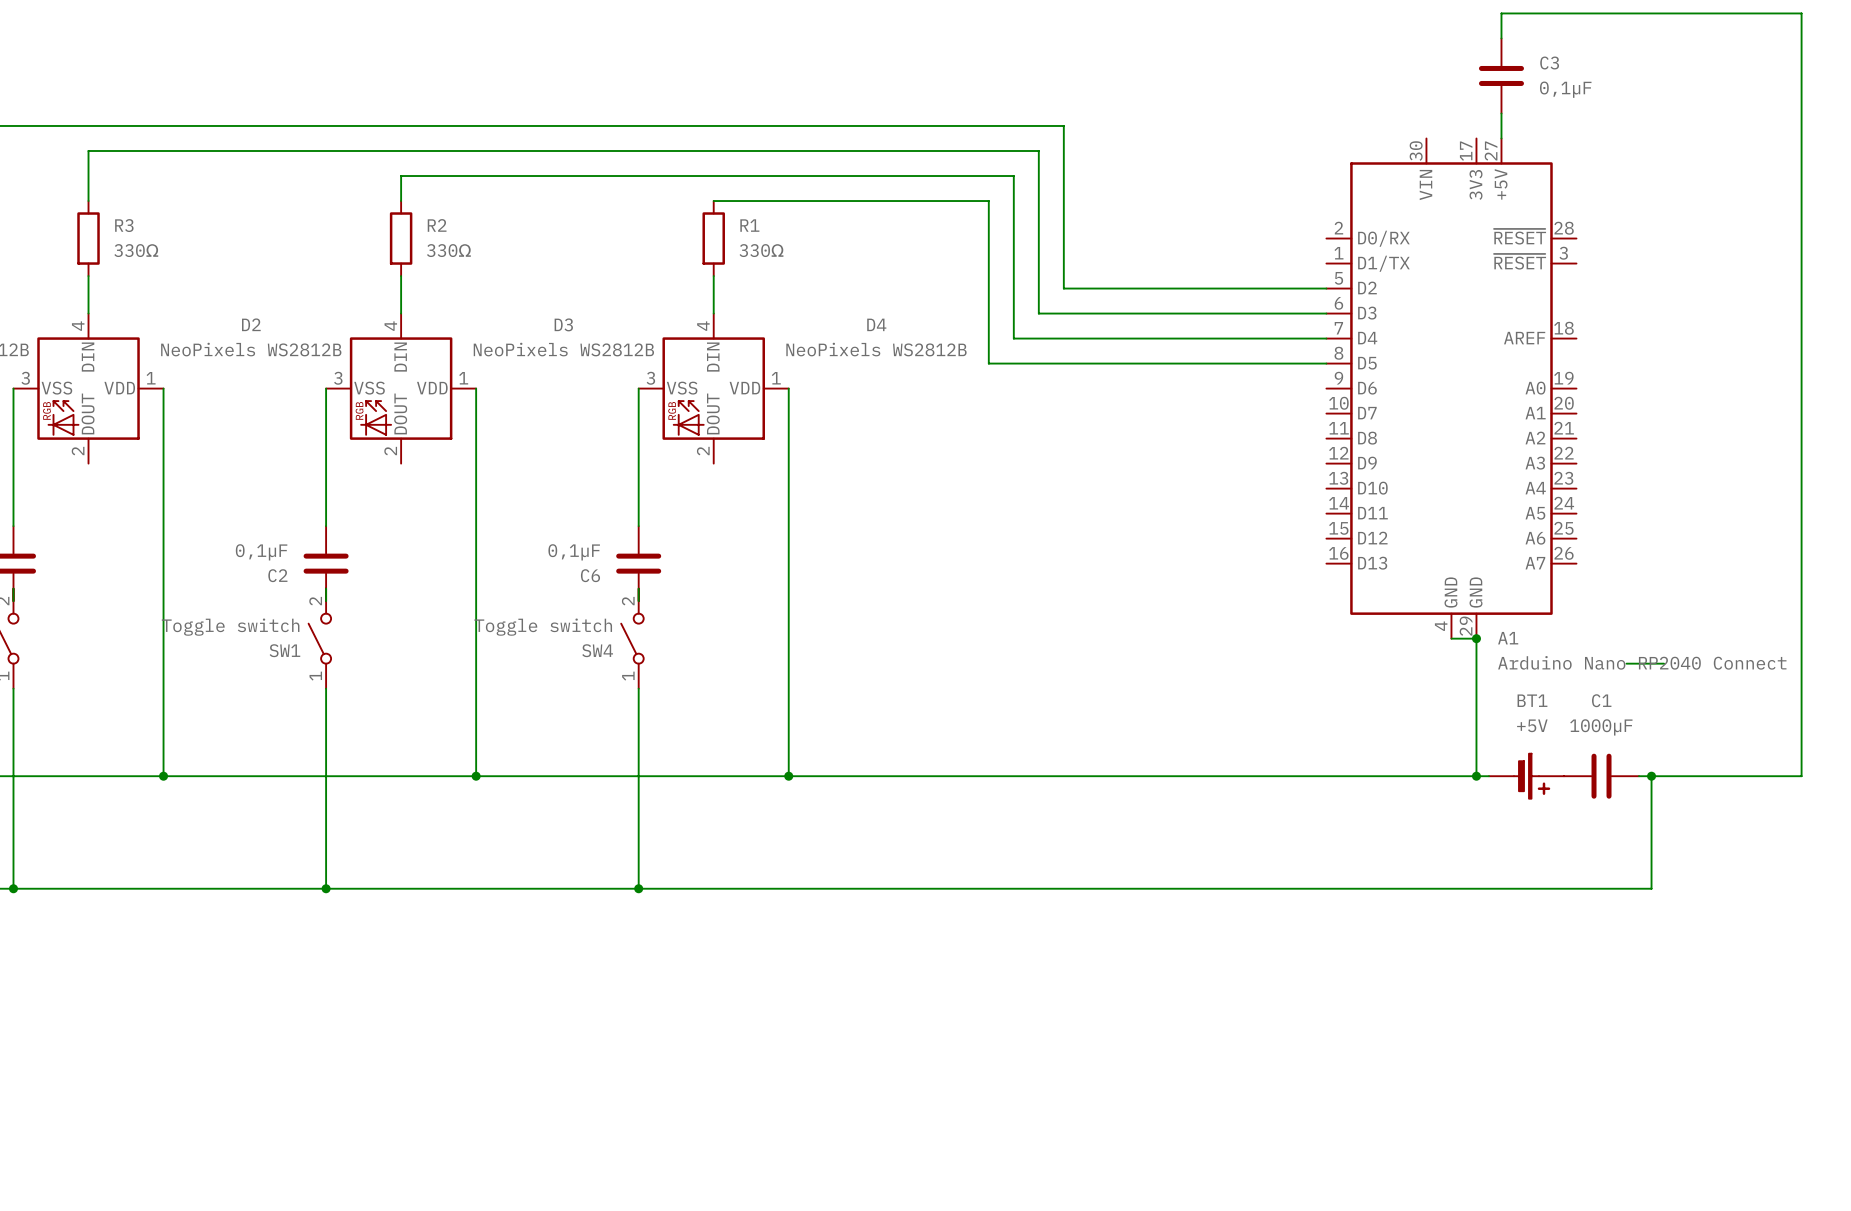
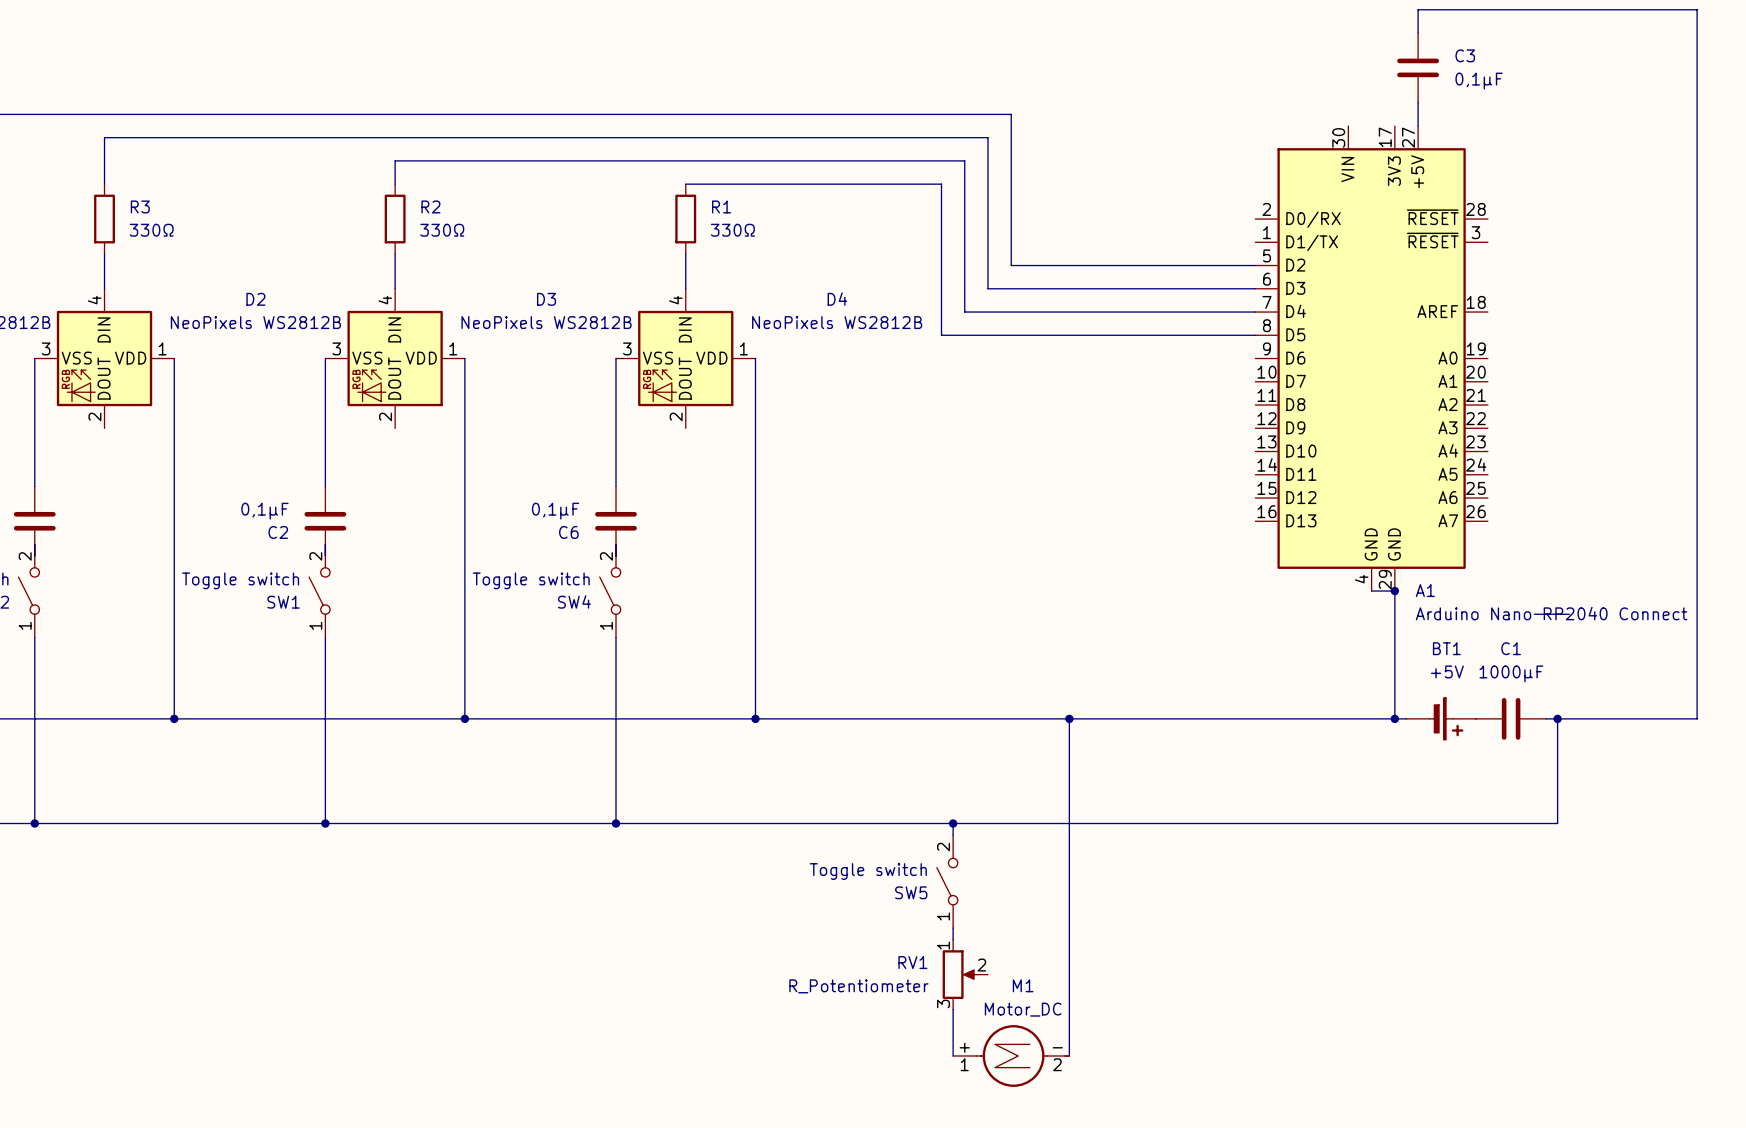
wire: none -> (1069, 718) (1069, 1056)
junction: none -> (1069, 718)
wire: none -> (953, 823) (953, 835)
junction: none -> (953, 823)
SW5: none -> Toggle switch (947, 881)
wire: none -> (953, 928) (953, 939)
RV1: none -> R_Potentiometer (965, 974)
wire: none -> (953, 1009) (953, 1056)
M1: none -> Motor_DC (1011, 1056)

